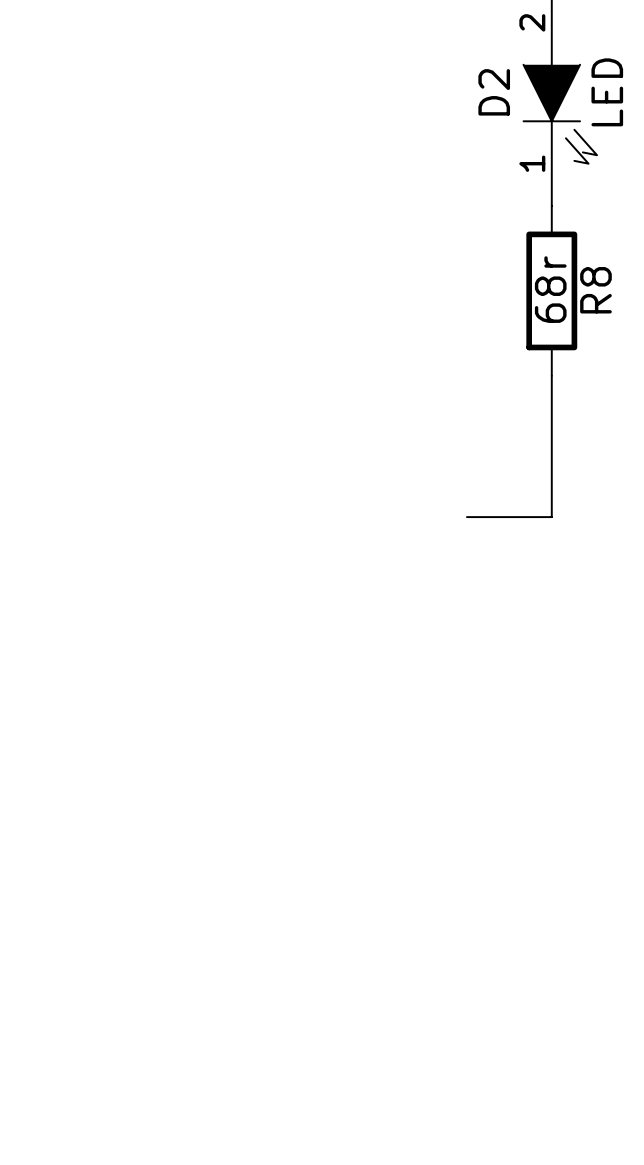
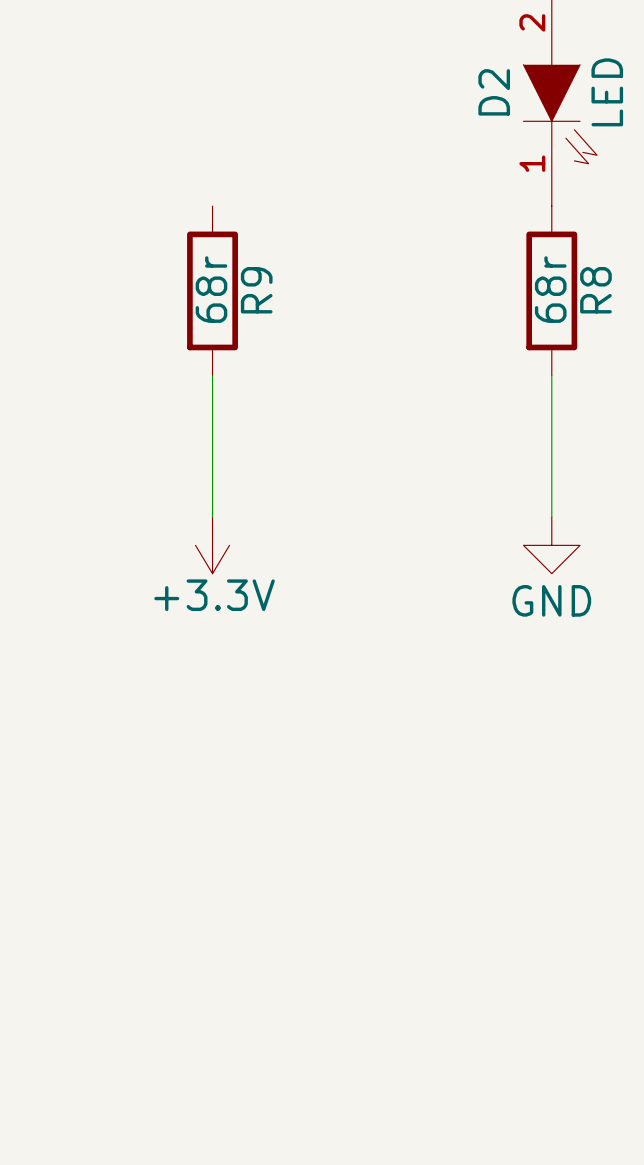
R9: none -> 68r (212, 290)
wire: none -> (212, 375) (212, 517)
wire: (466, 517) (551, 517) -> none
power symbol: none -> +3.3V (212, 545)
power symbol: none -> GND (551, 545)

